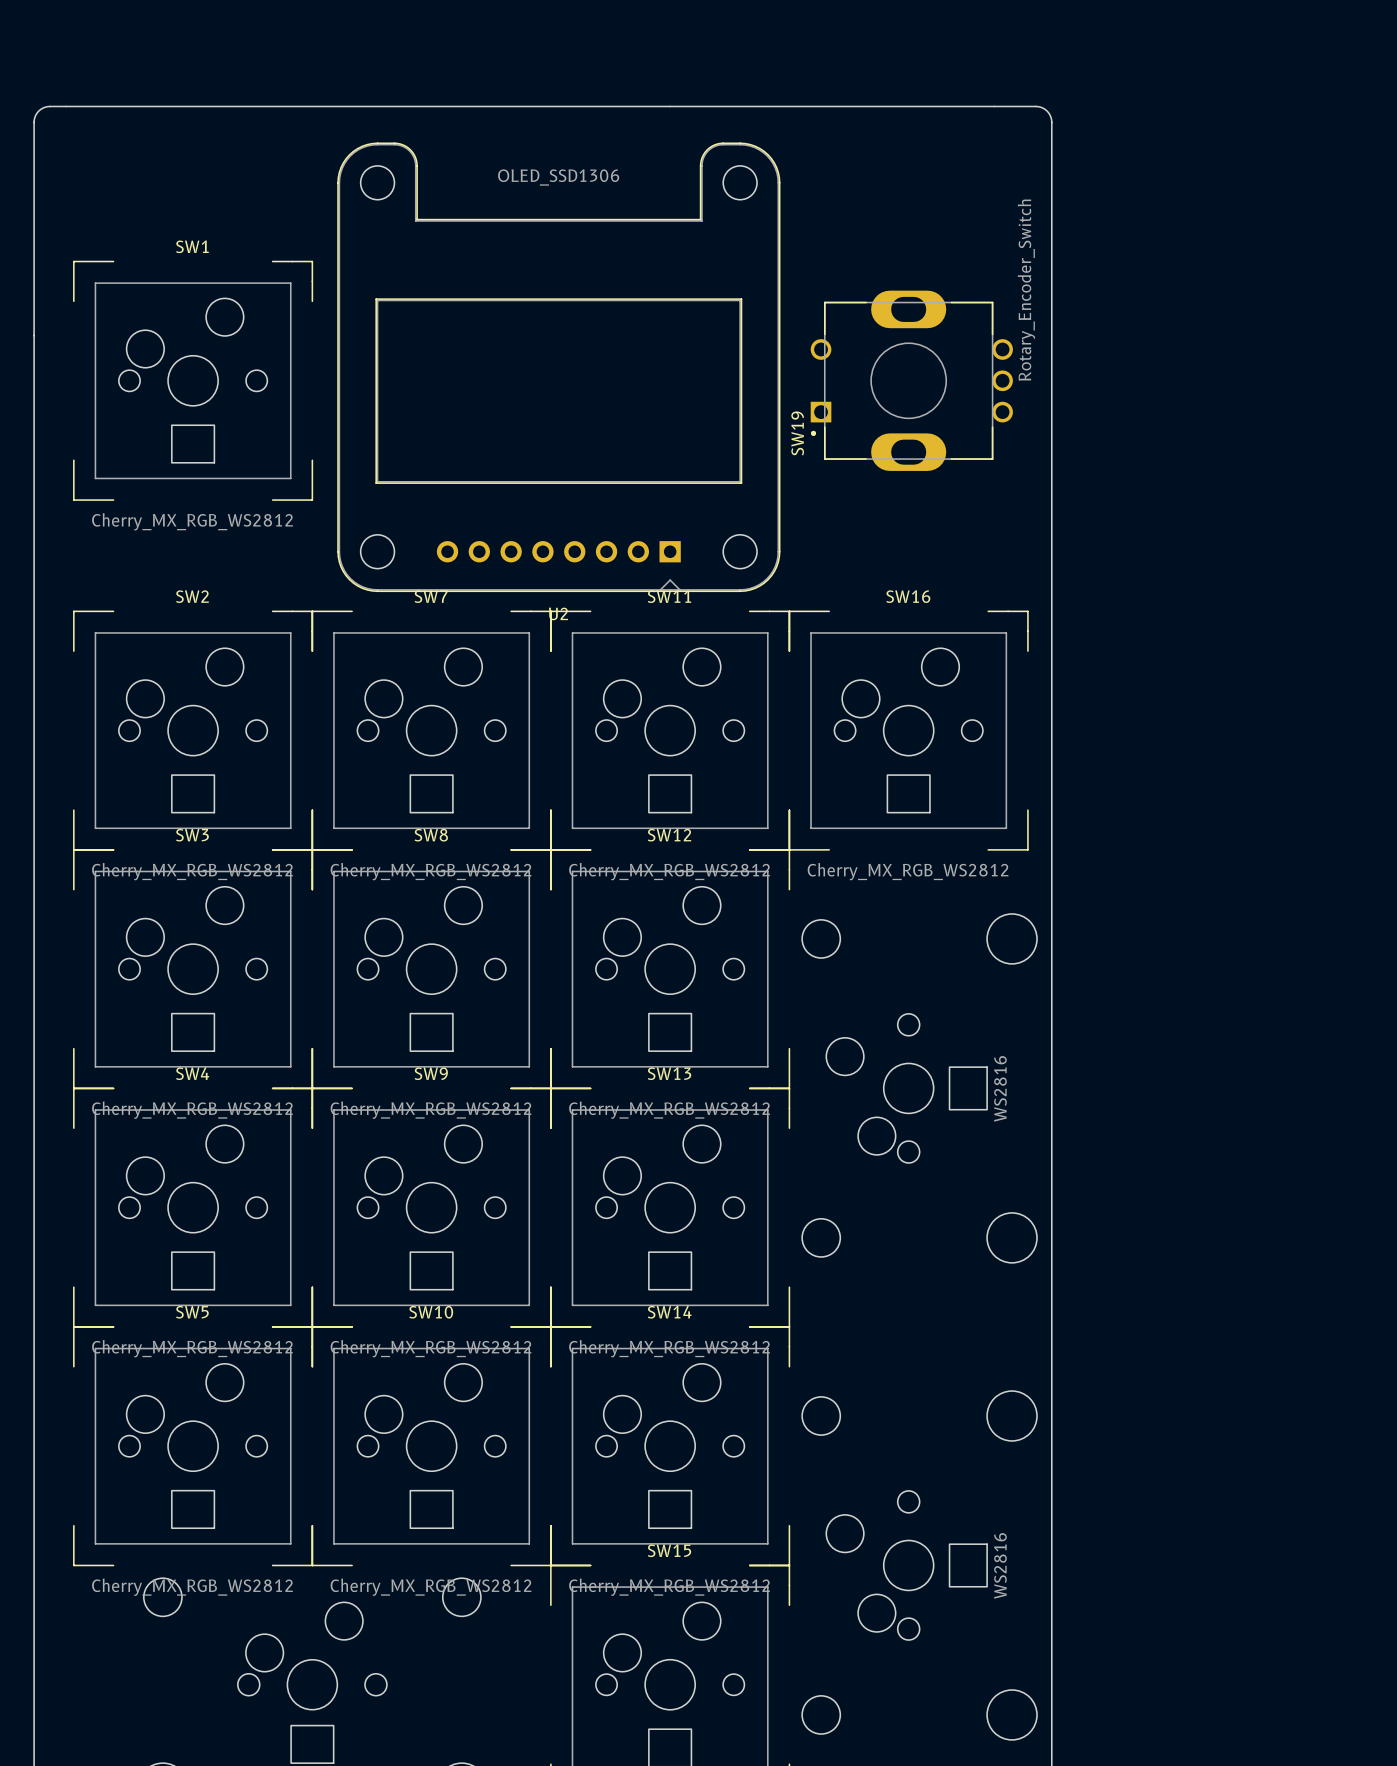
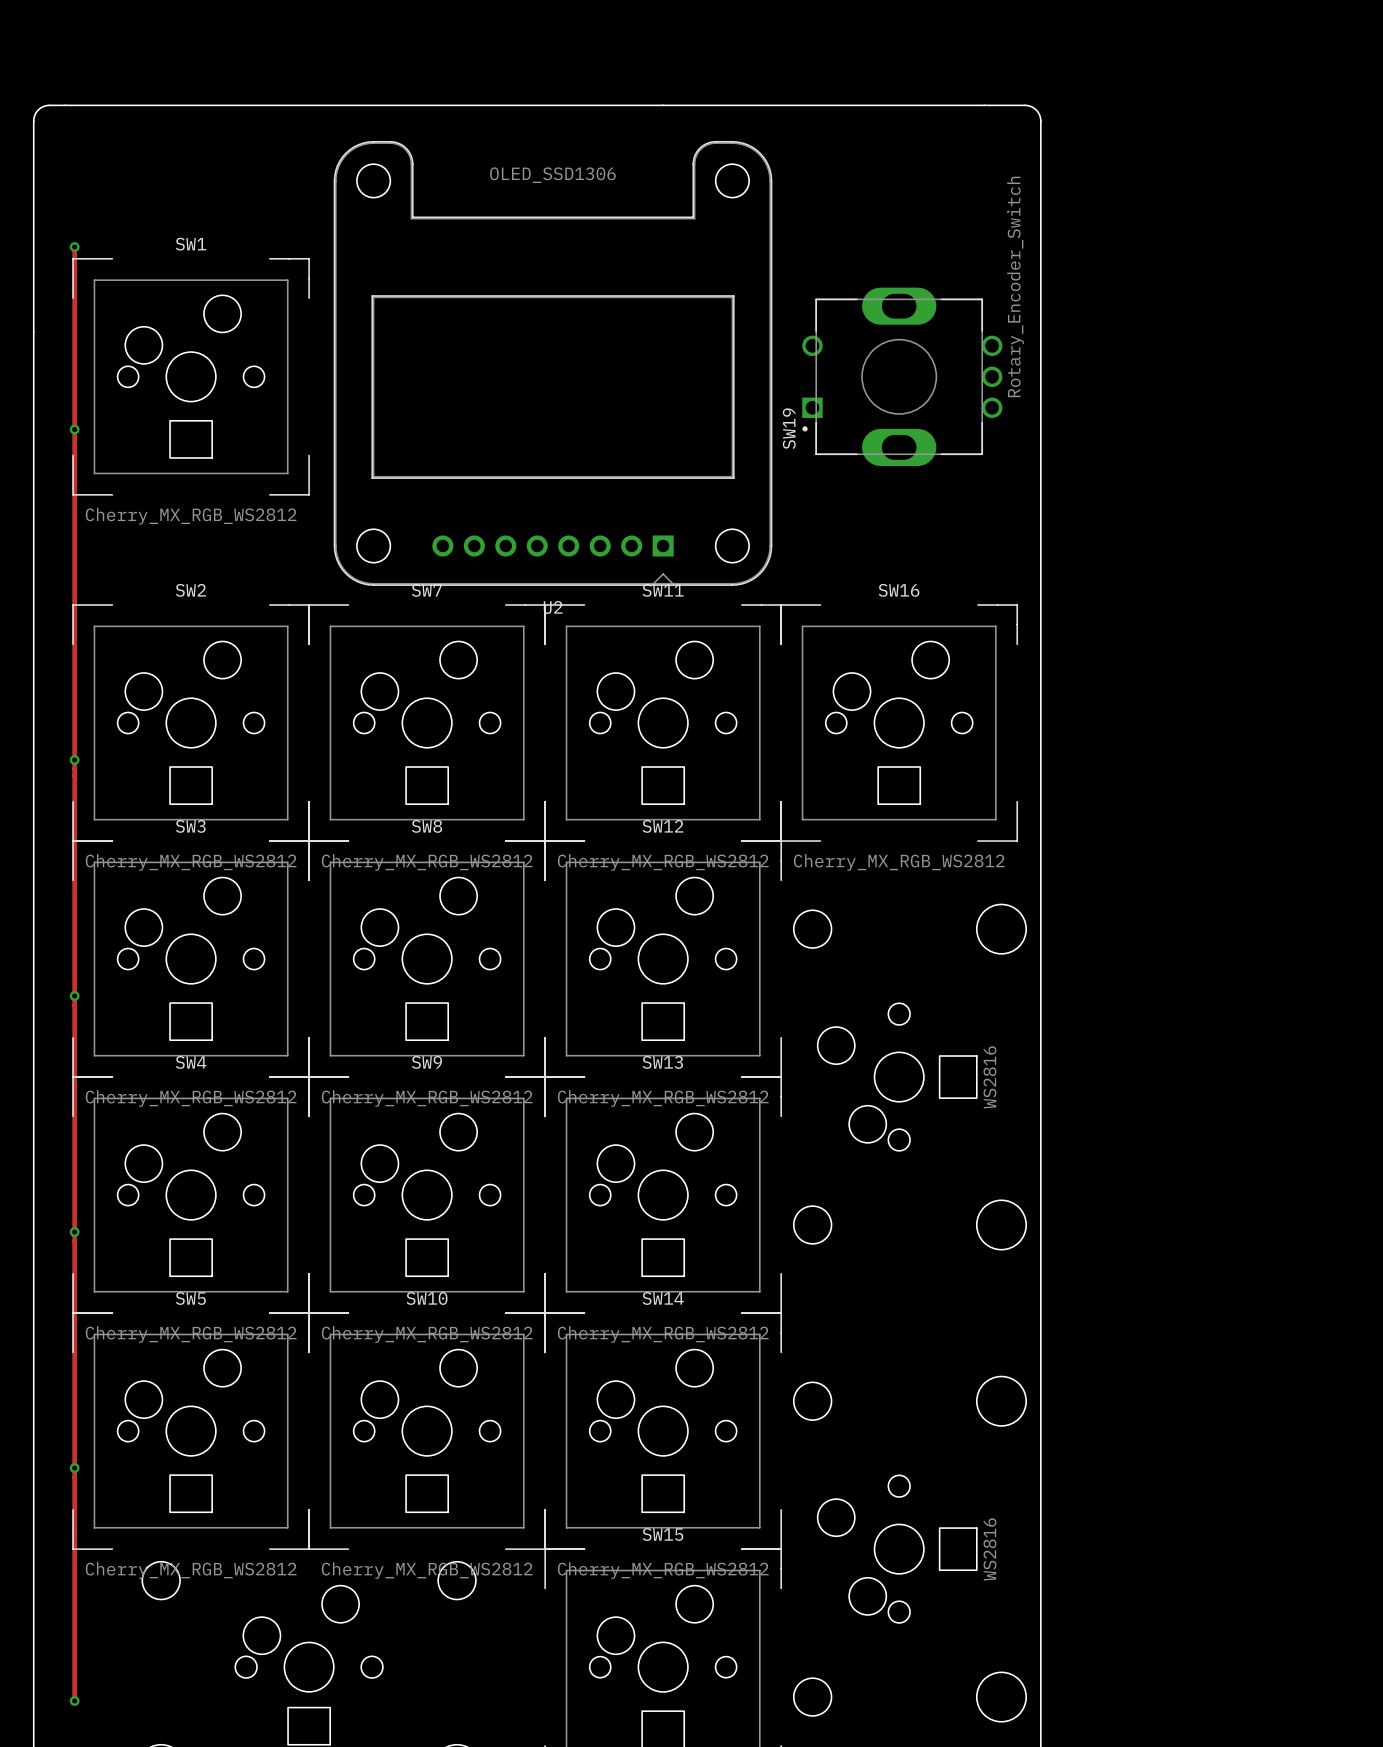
track: none -> (74, 247) (74, 1701)
via: none -> (74, 247)
via: none -> (74, 429)
via: none -> (74, 759)
via: none -> (74, 996)
via: none -> (74, 1232)
via: none -> (74, 1468)
via: none -> (74, 1701)

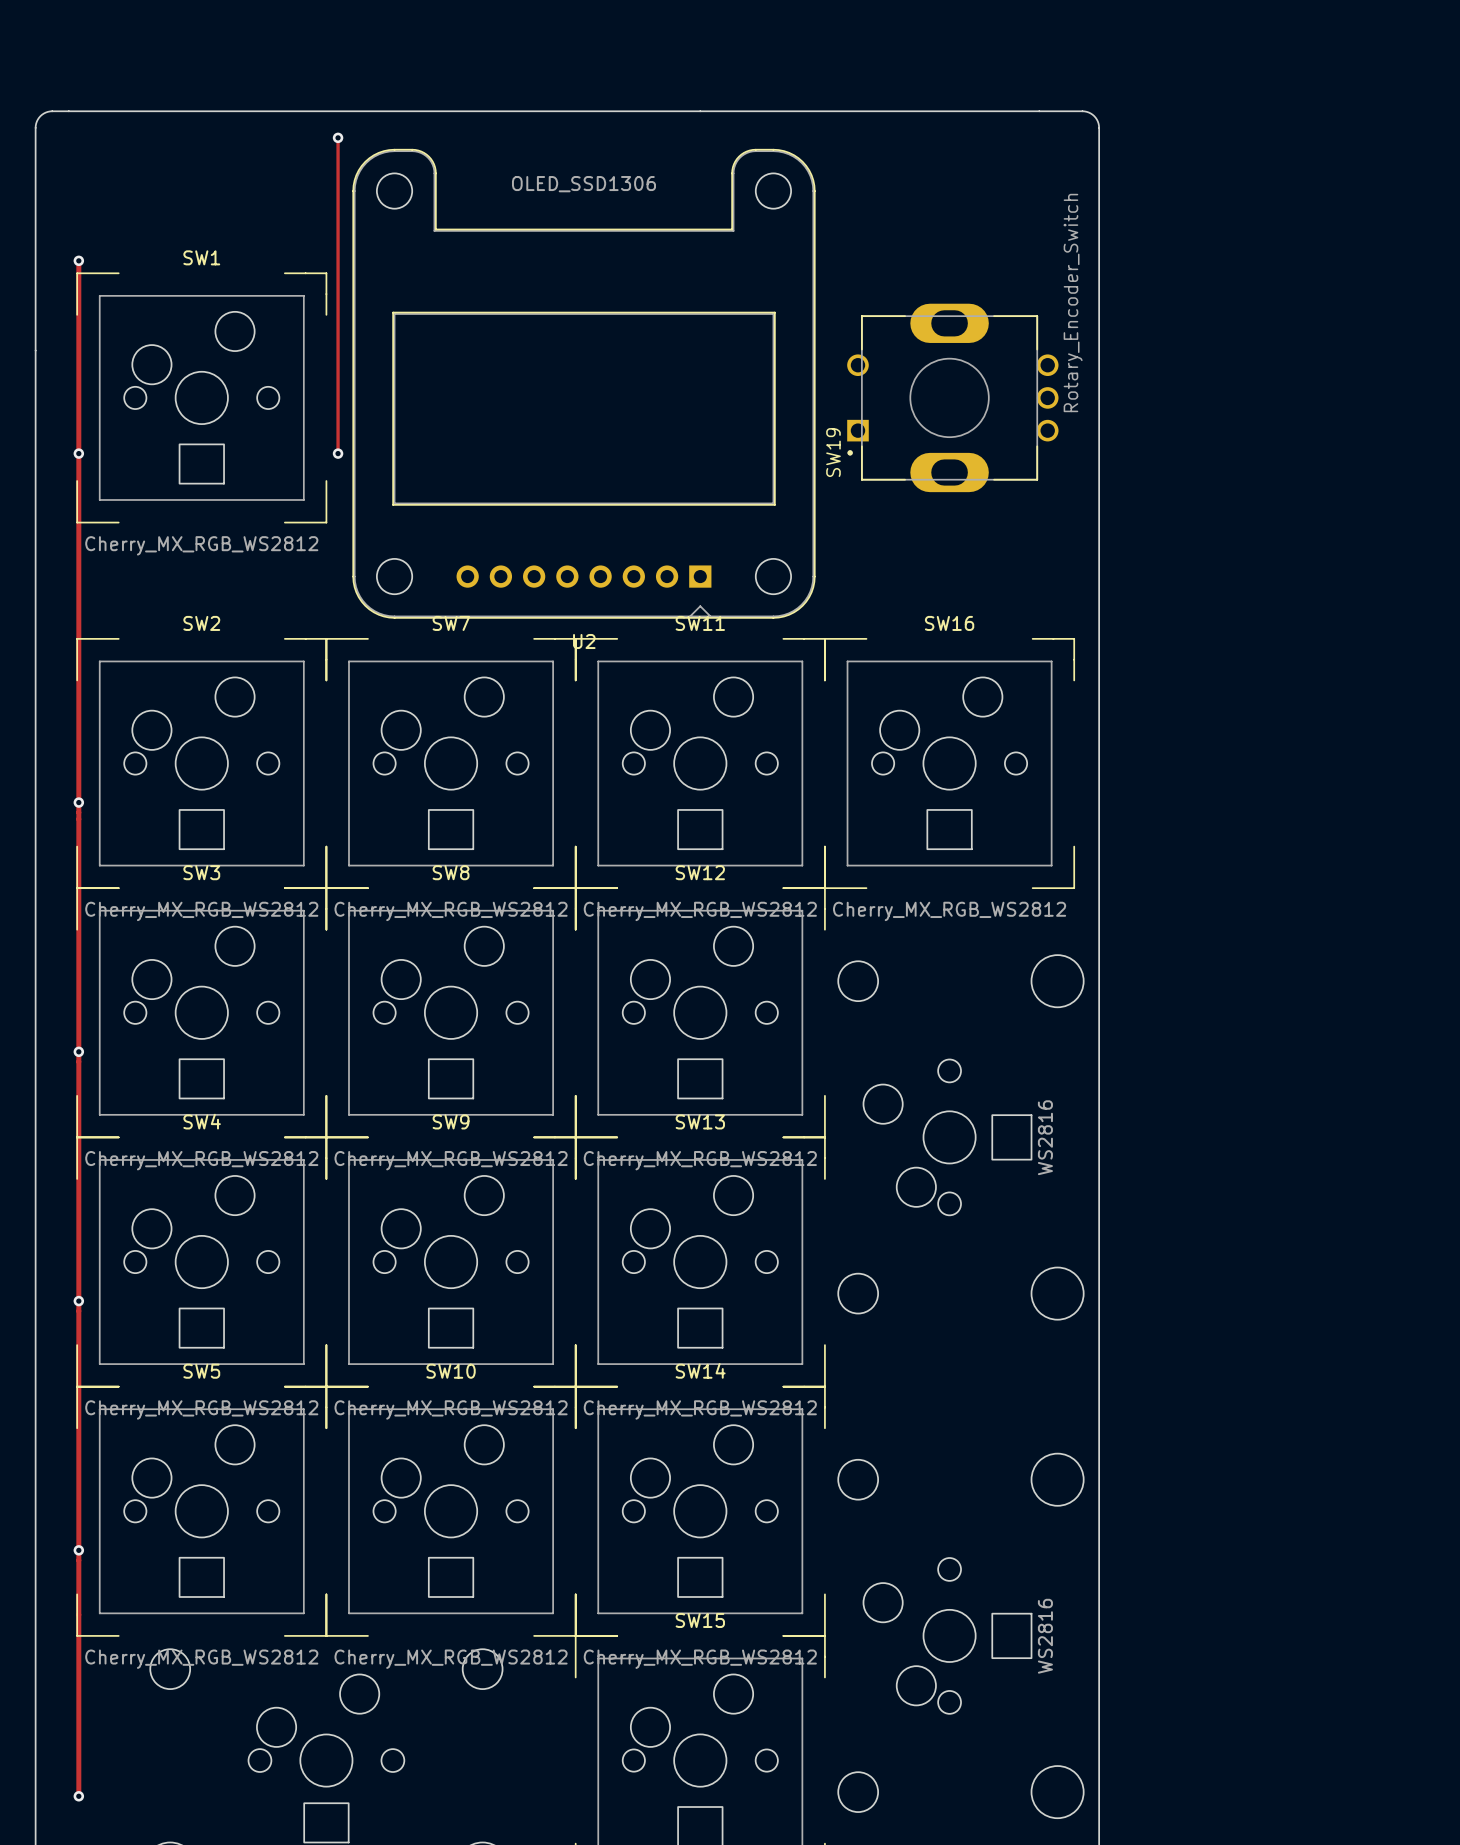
track: none -> (338, 137) (338, 453)
via: none -> (338, 137)
via: none -> (338, 453)

